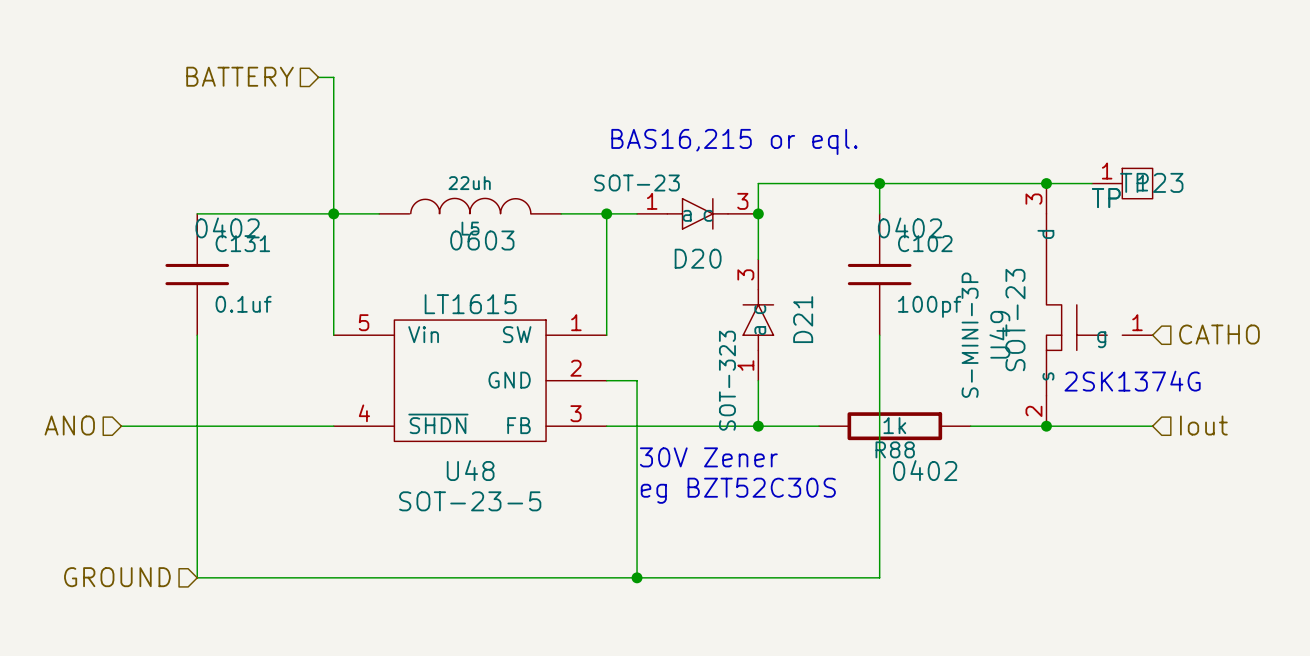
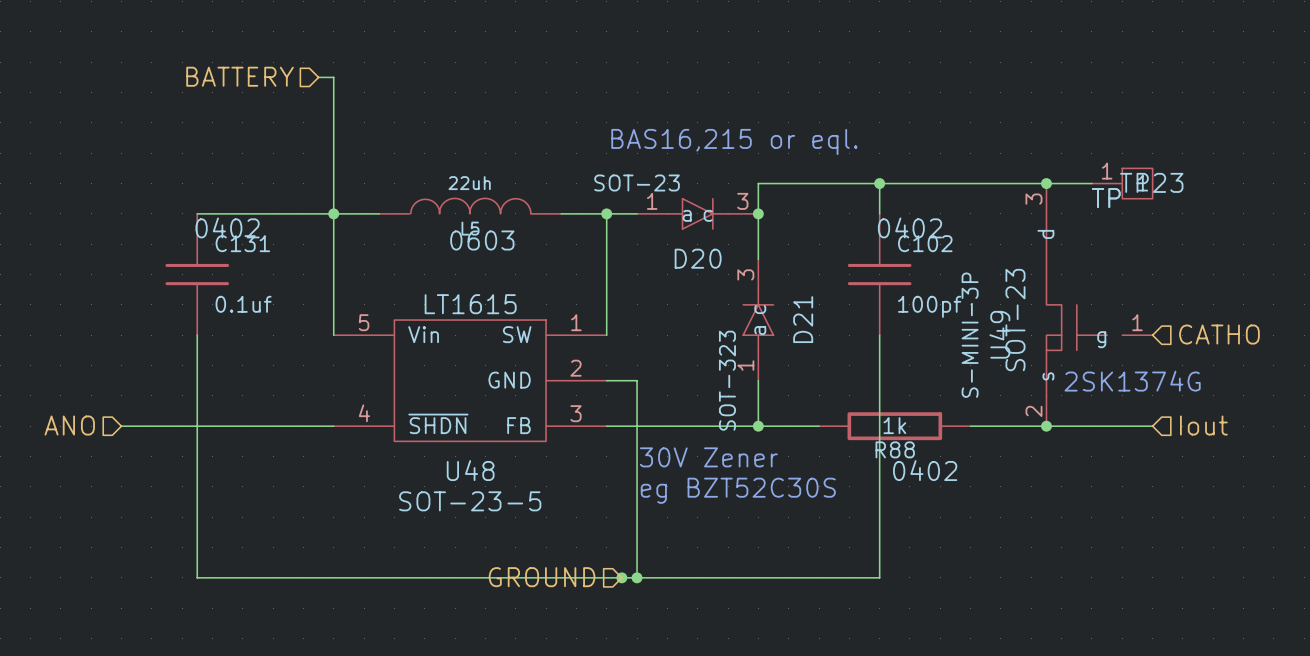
hierarchical label: GROUND (117, 577) -> none
hierarchical label: none -> GROUND (542, 577)
junction: none -> (621, 577)

